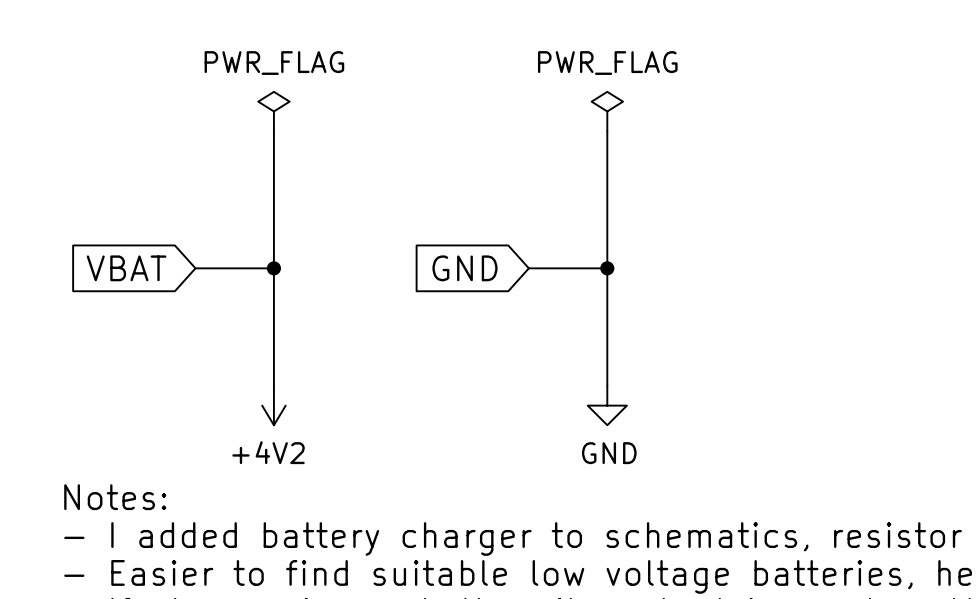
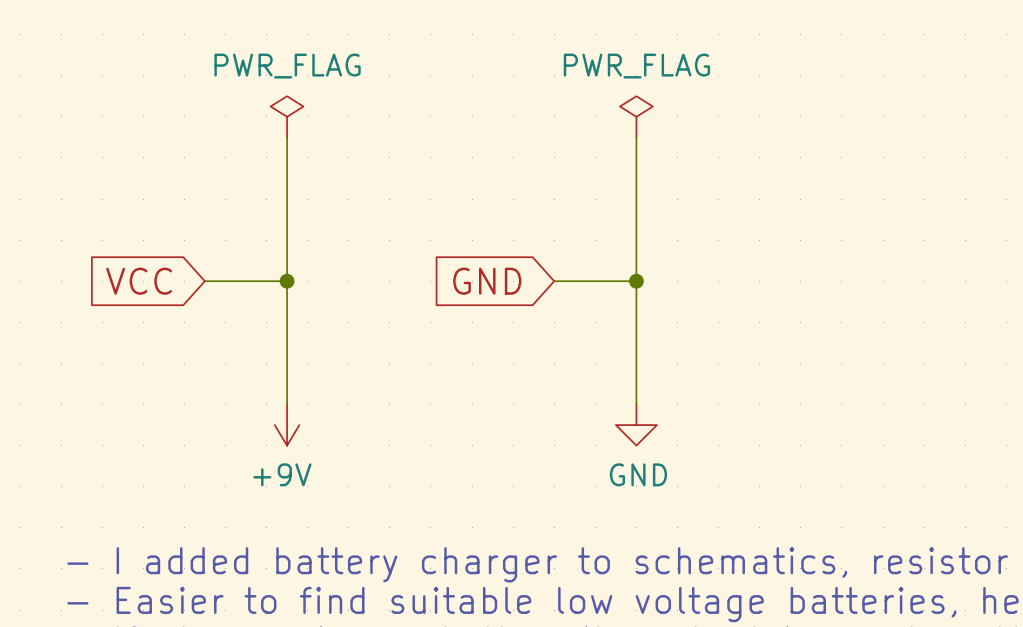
global label: VBAT (126, 268) -> VCC (139, 281)
power symbol: +4V2 (273, 405) -> +9V (287, 425)
text: Notes: (115, 497) -> none

